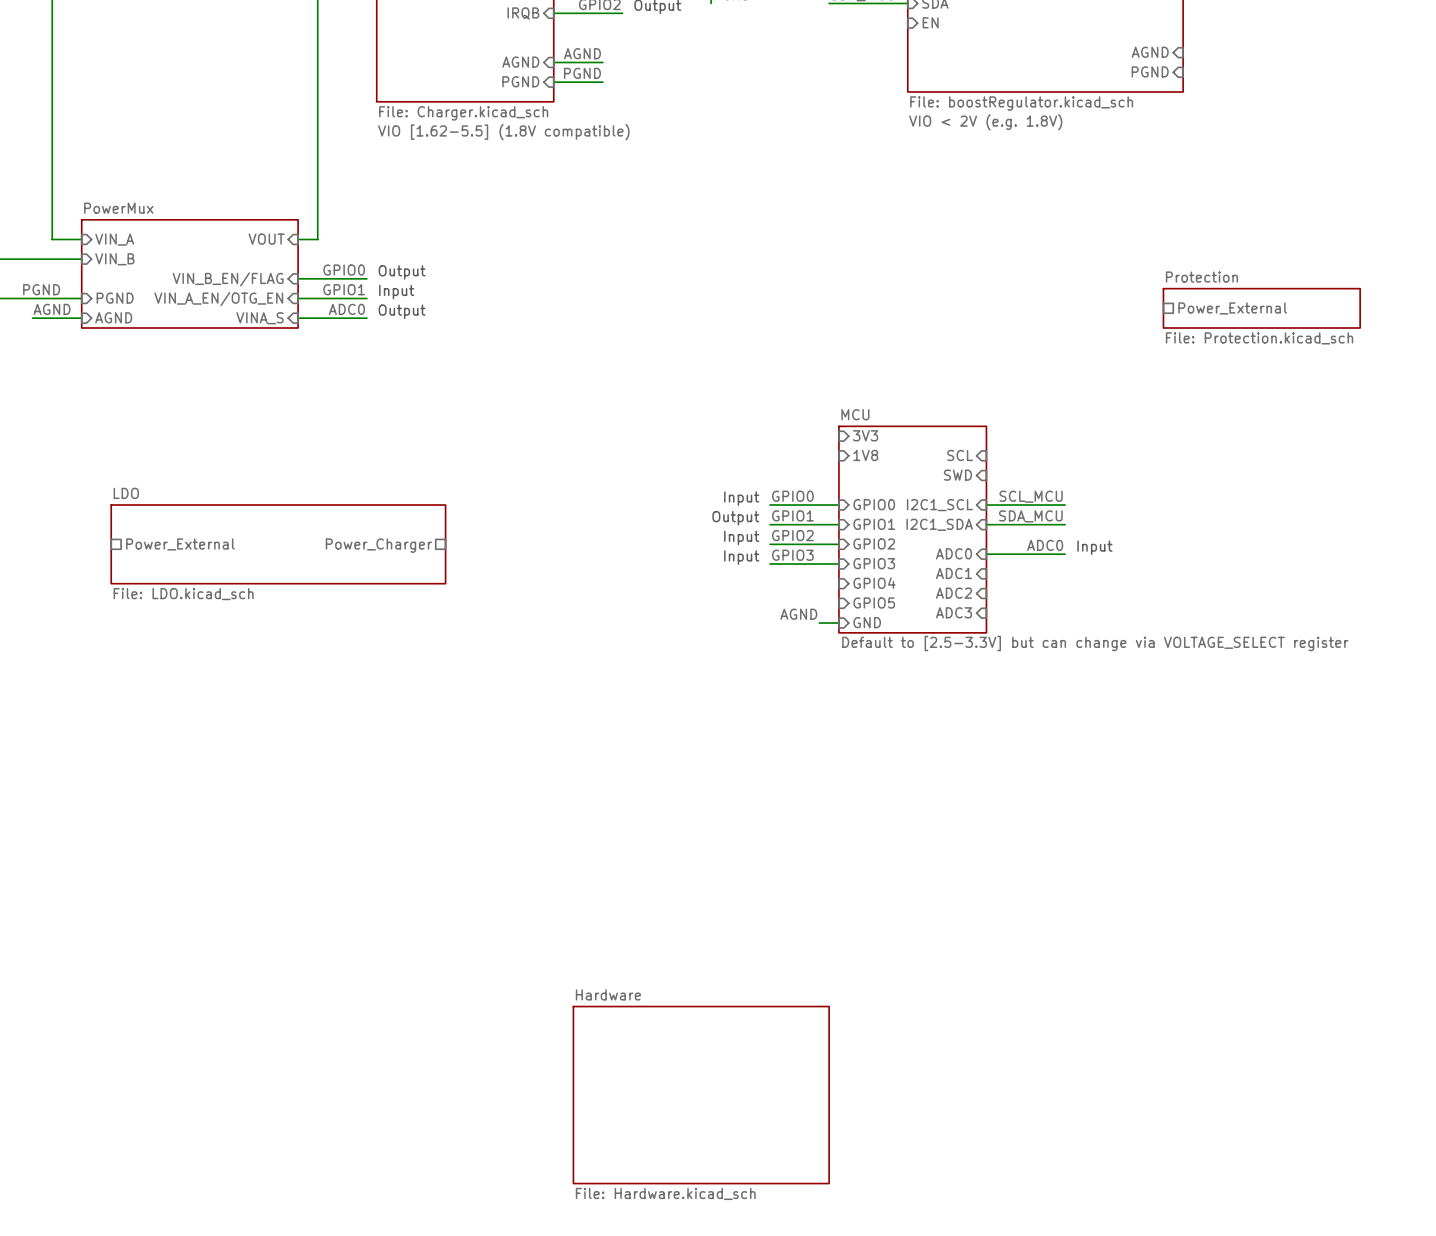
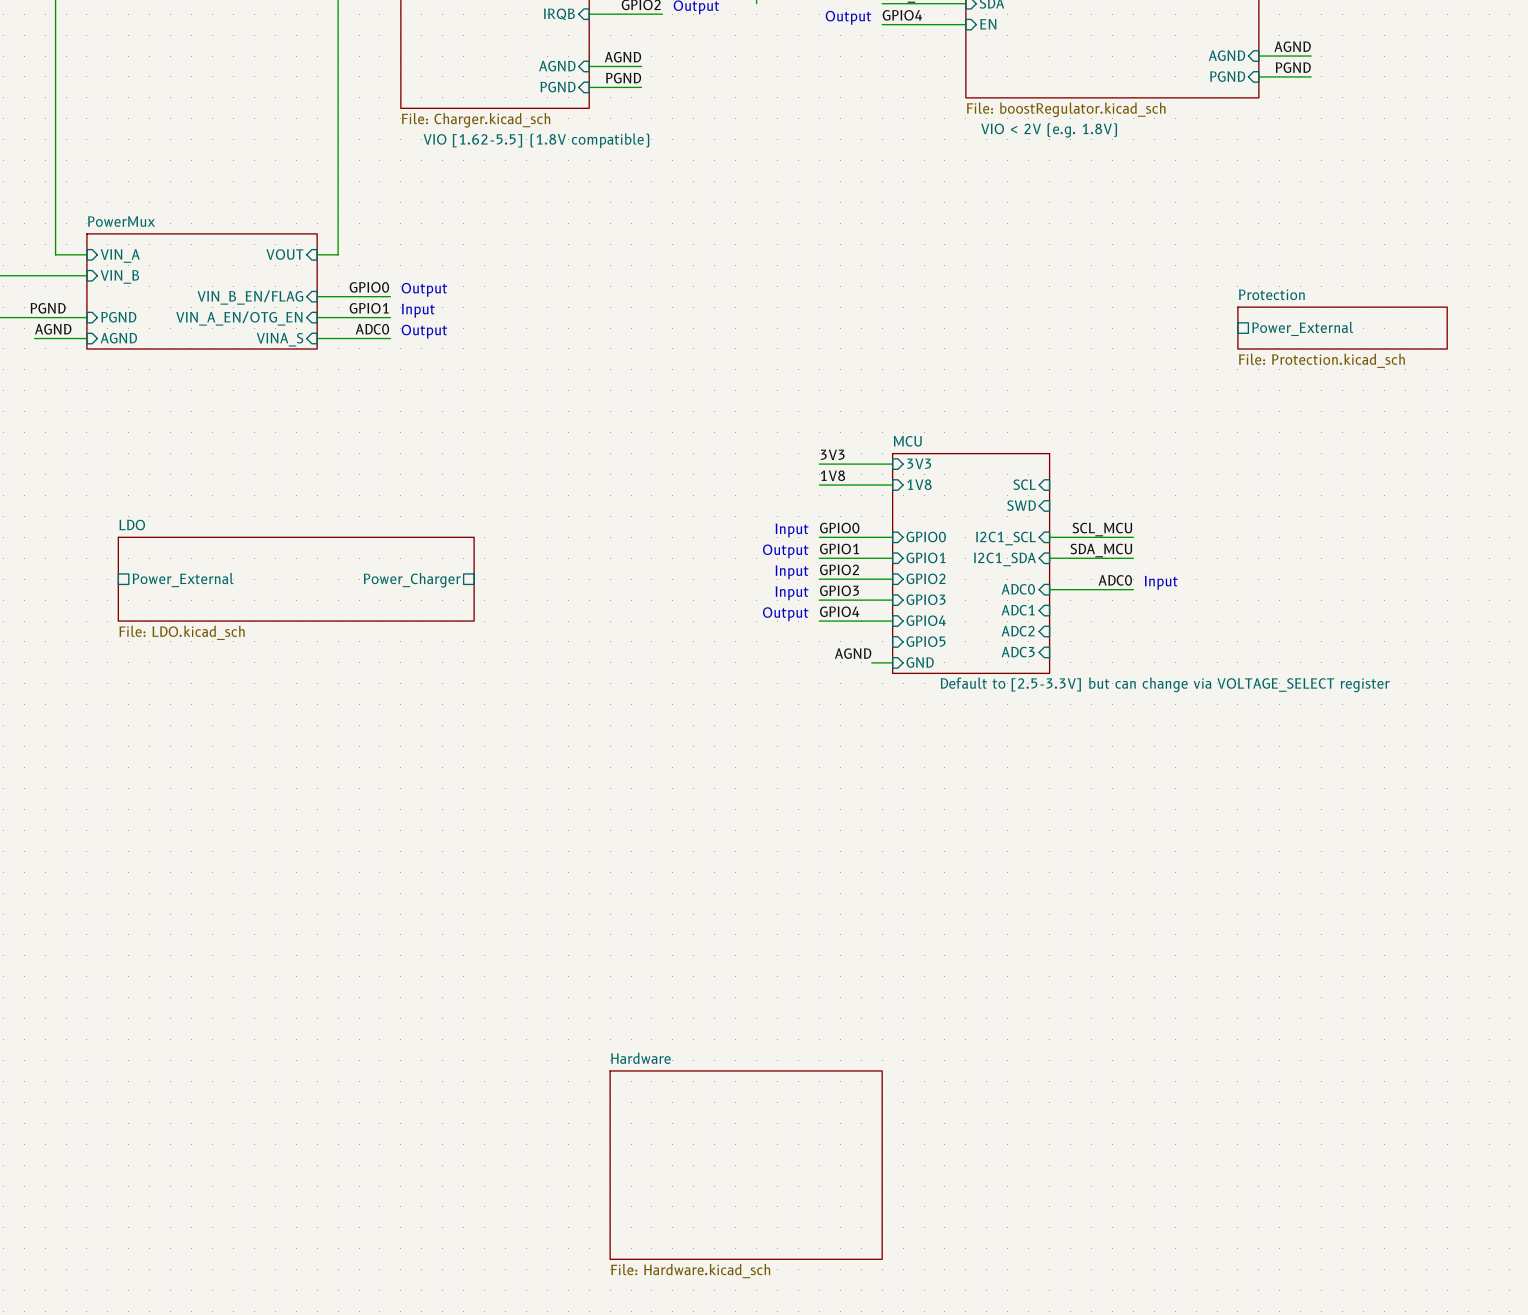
label: none -> GPIO4 (902, 15)
text: none -> Output (848, 17)
wire: none -> (882, 24) (965, 24)
label: none -> AGND (1292, 46)
wire: none -> (1258, 56) (1311, 56)
label: none -> PGND (1293, 67)
wire: none -> (1258, 76) (1311, 76)
label: none -> 3V3 (832, 454)
wire: none -> (819, 464) (892, 464)
label: none -> 1V8 (832, 475)
wire: none -> (819, 485) (892, 485)
label: none -> GPIO4 (839, 611)
text: none -> Output (785, 614)
wire: none -> (819, 621) (892, 621)

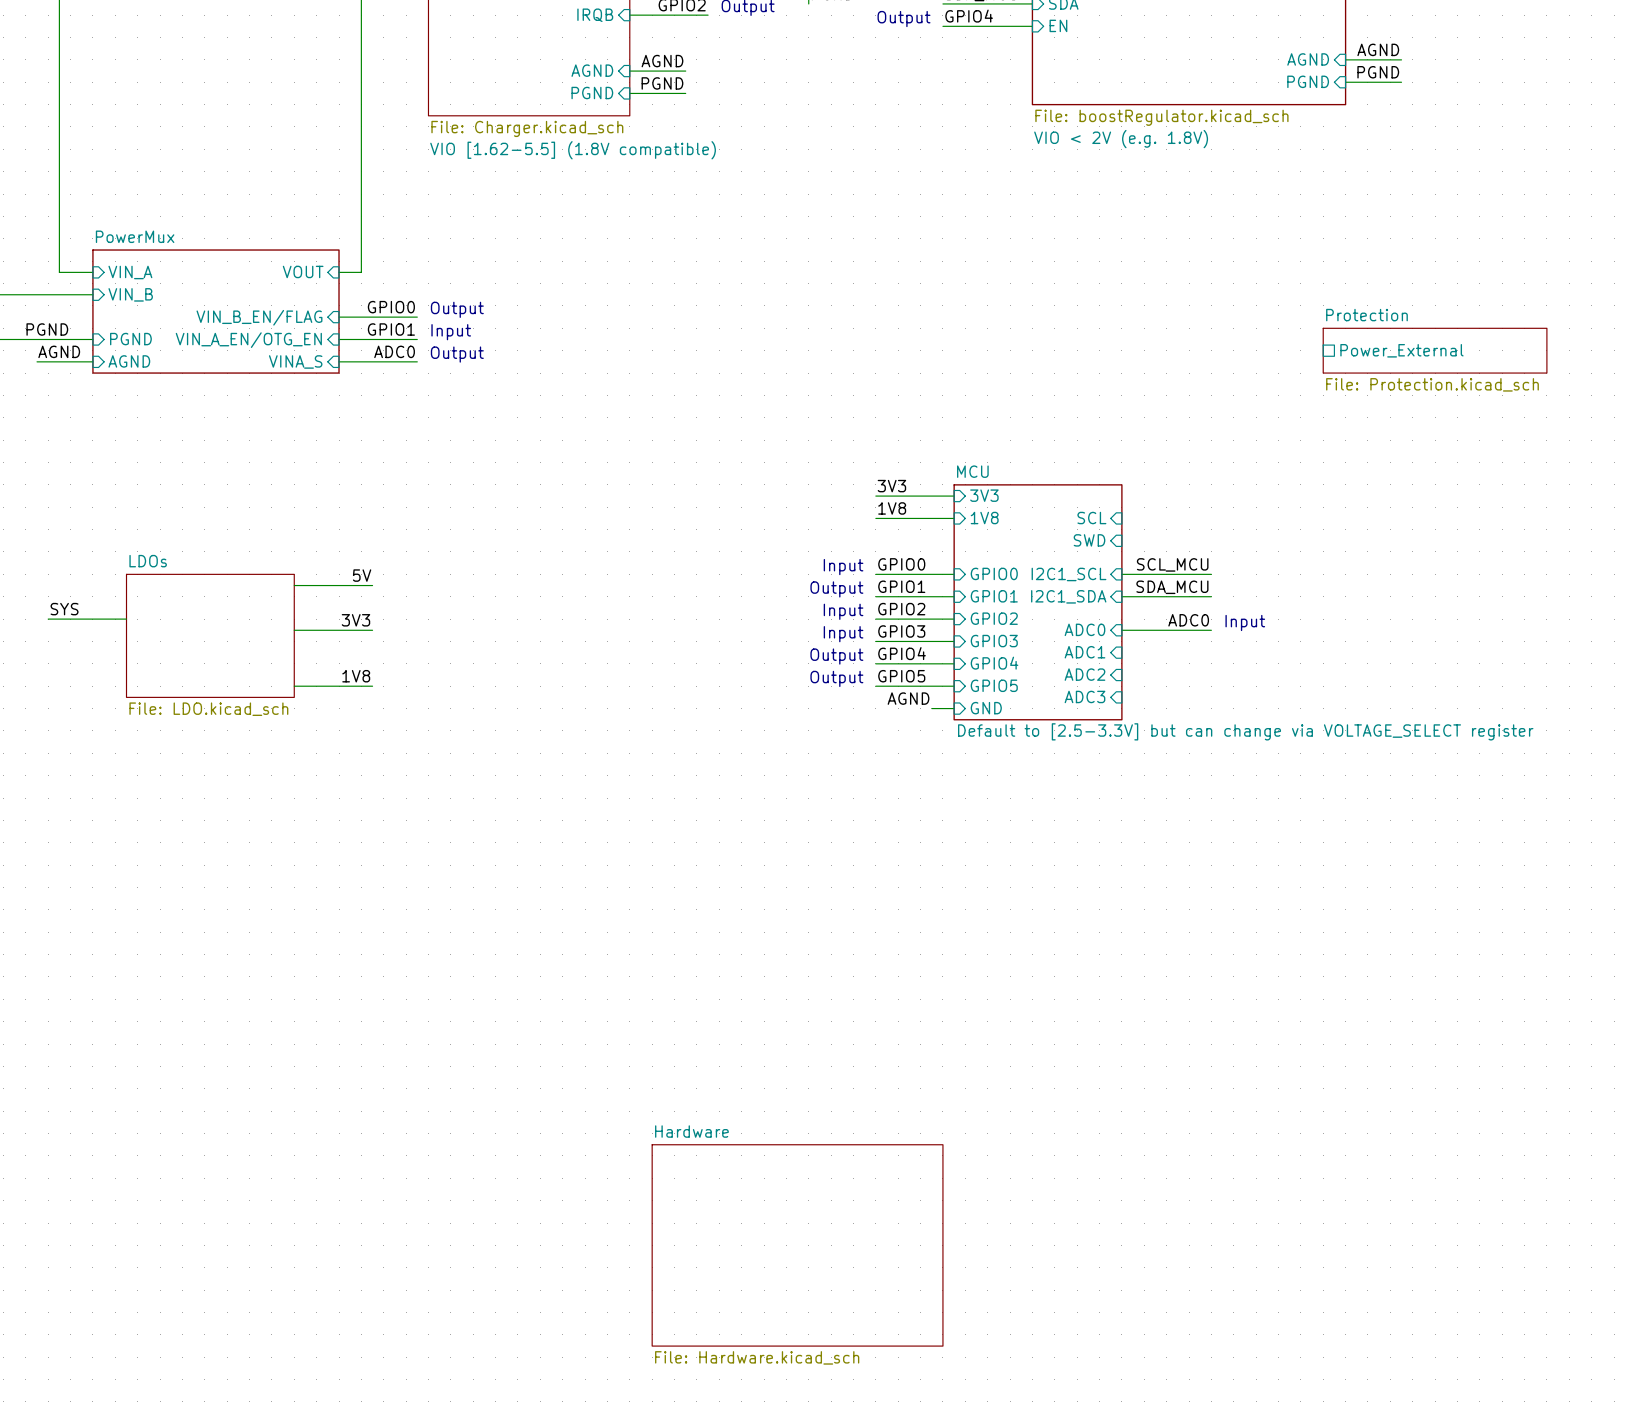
label: none -> 5V (362, 575)
wire: none -> (294, 585) (372, 585)
label: none -> SYS (64, 609)
wire: none -> (48, 619) (126, 619)
sheet LDO: File: LDO.kicad_sch (296, 579) -> none
sheet pin: Power_External (183, 580) -> none
label: none -> 3V3 (355, 620)
sheet pin: Power_Charger (412, 580) -> none
wire: none -> (294, 630) (372, 630)
sheet LDOs: none -> File: LDO.kicad_sch (210, 635)
label: none -> 1V8 (356, 676)
label: none -> GPIO5 (901, 676)
text: none -> Output (836, 678)
wire: none -> (294, 686) (372, 686)
wire: none -> (875, 686) (954, 686)

